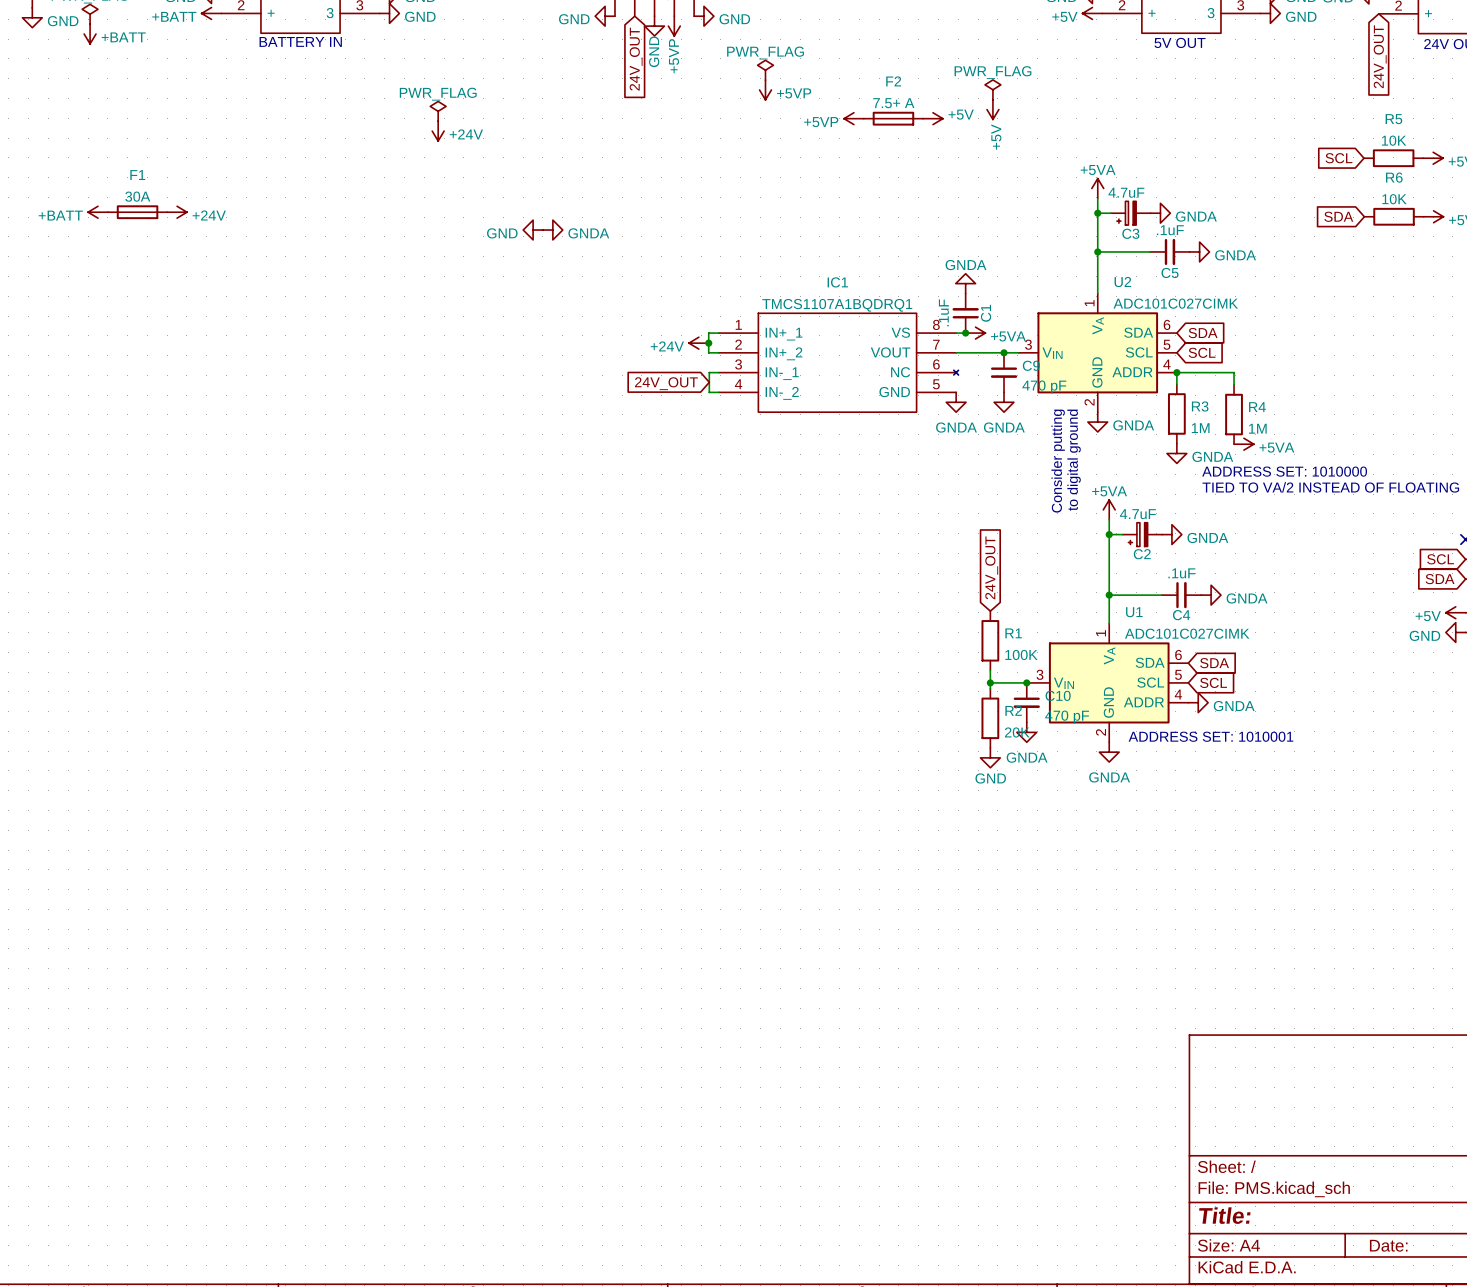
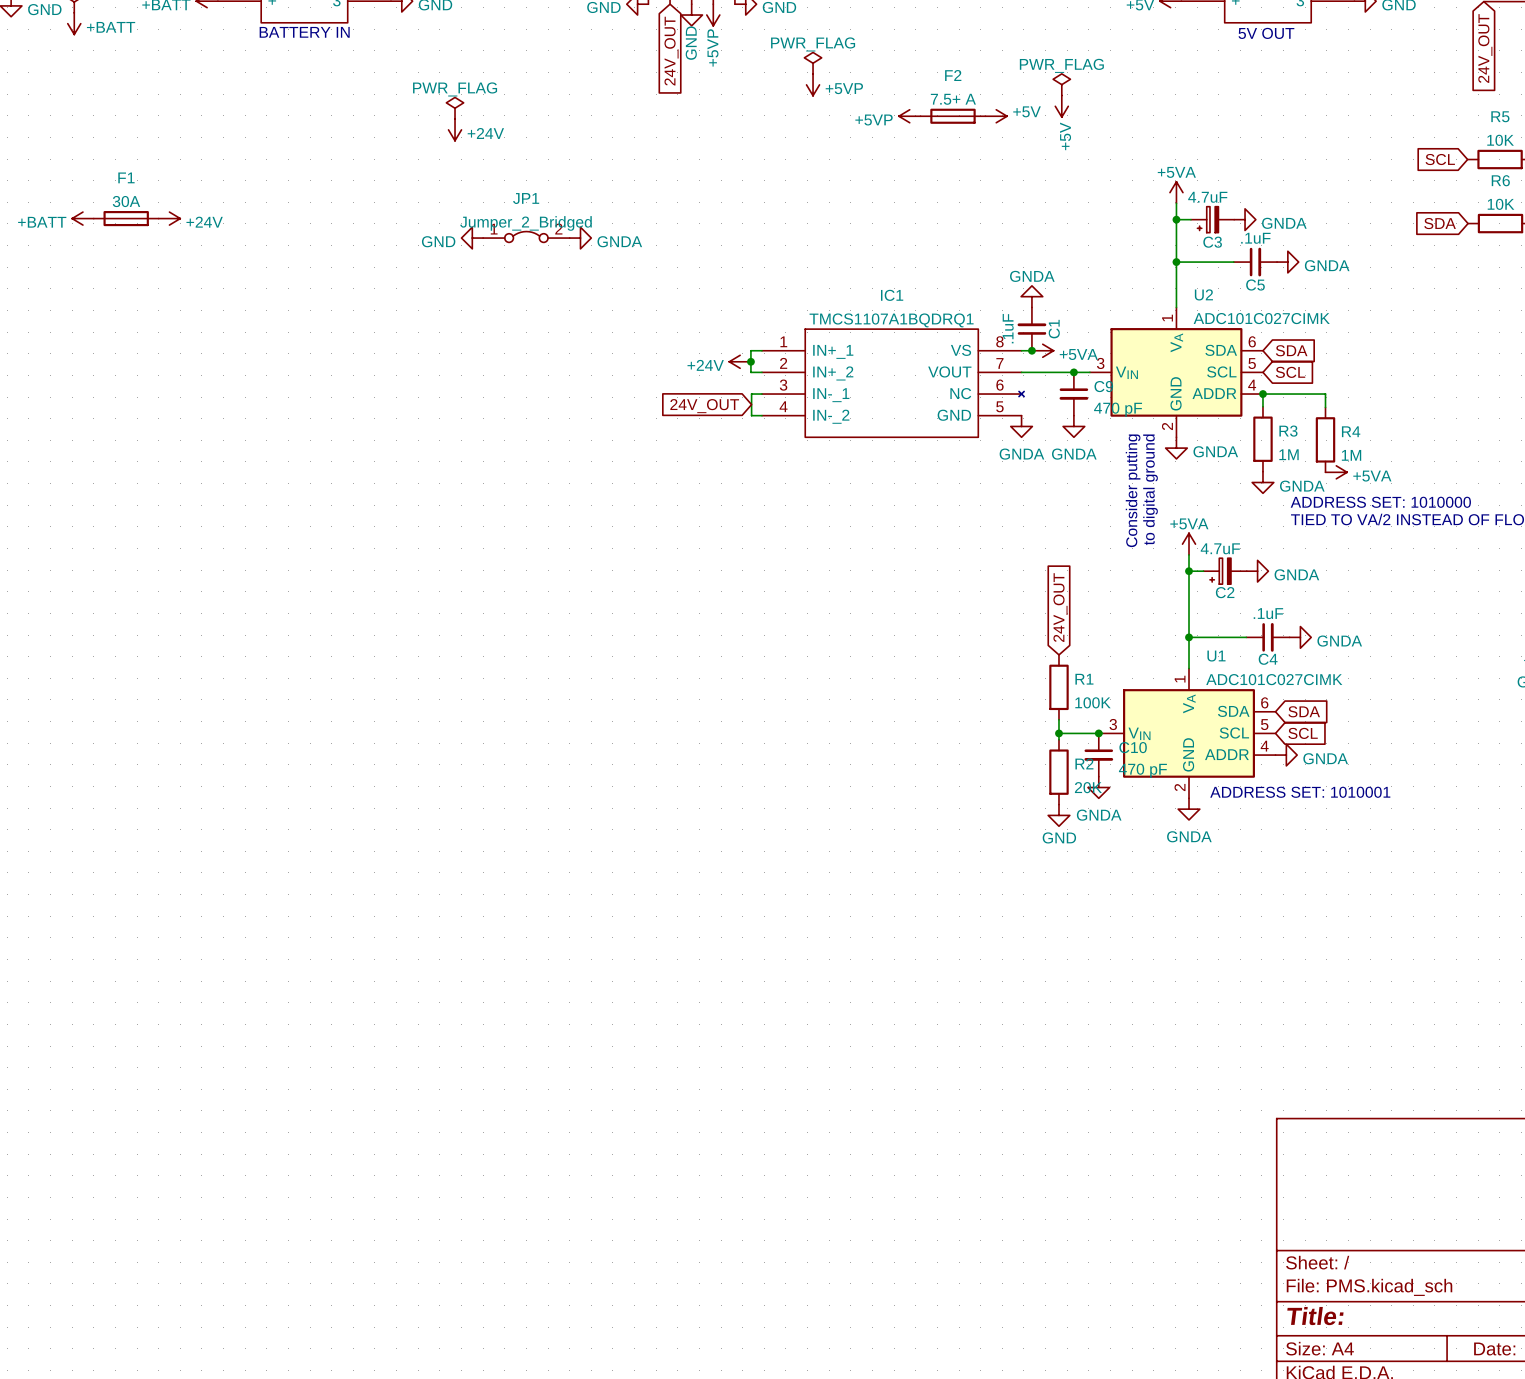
JP1: none -> Jumper_2_Bridged (526, 236)
power symbol position: GND (533, 230) -> GND (472, 238)

